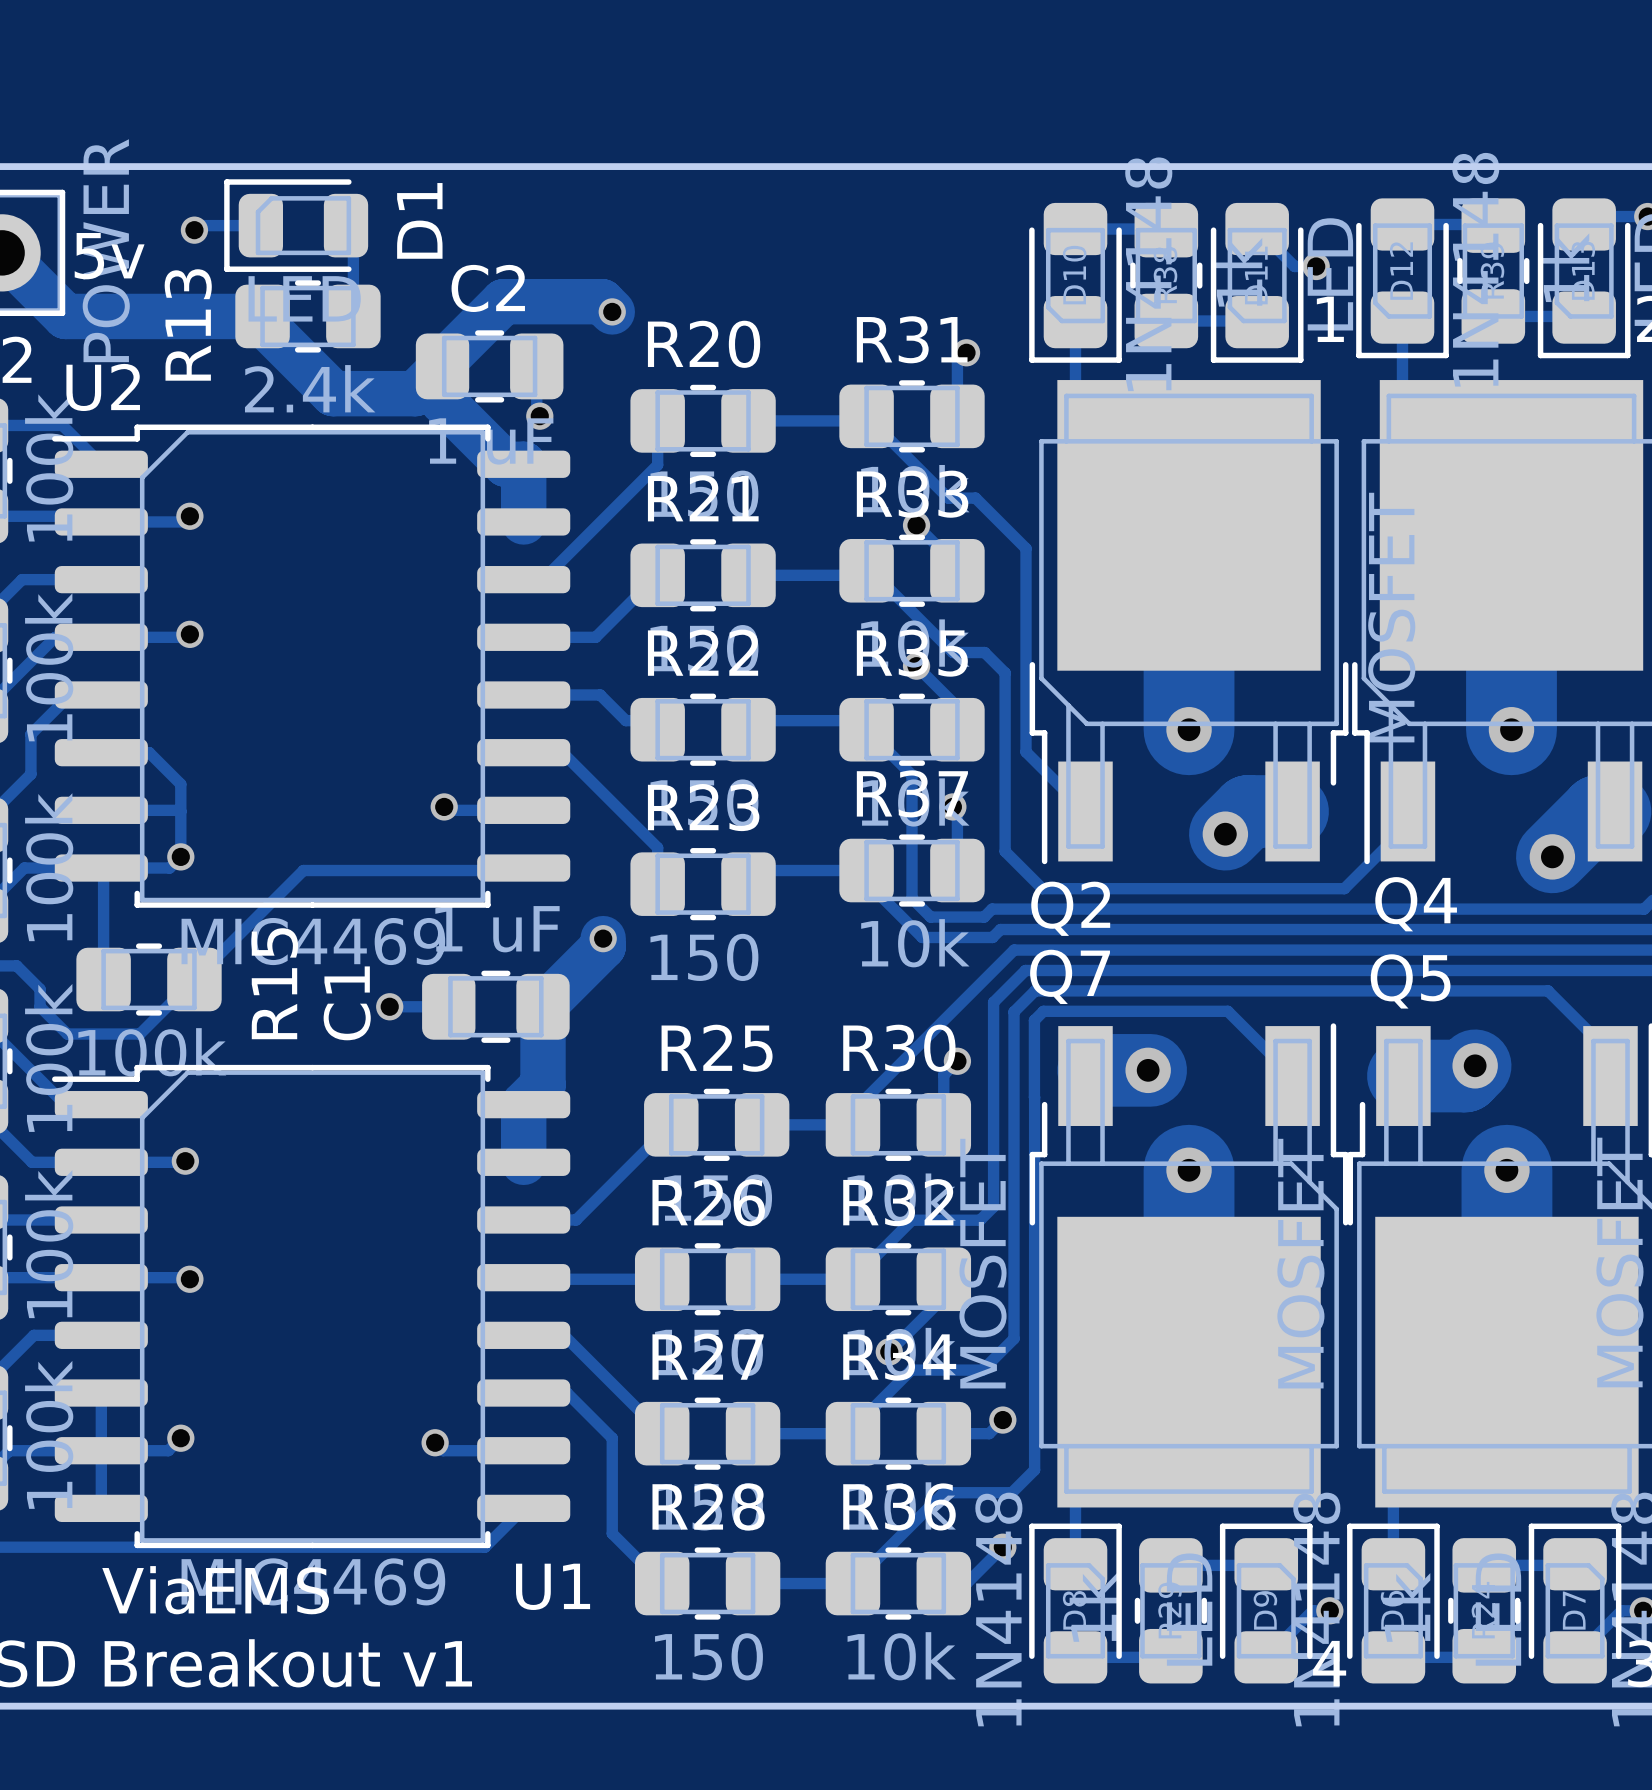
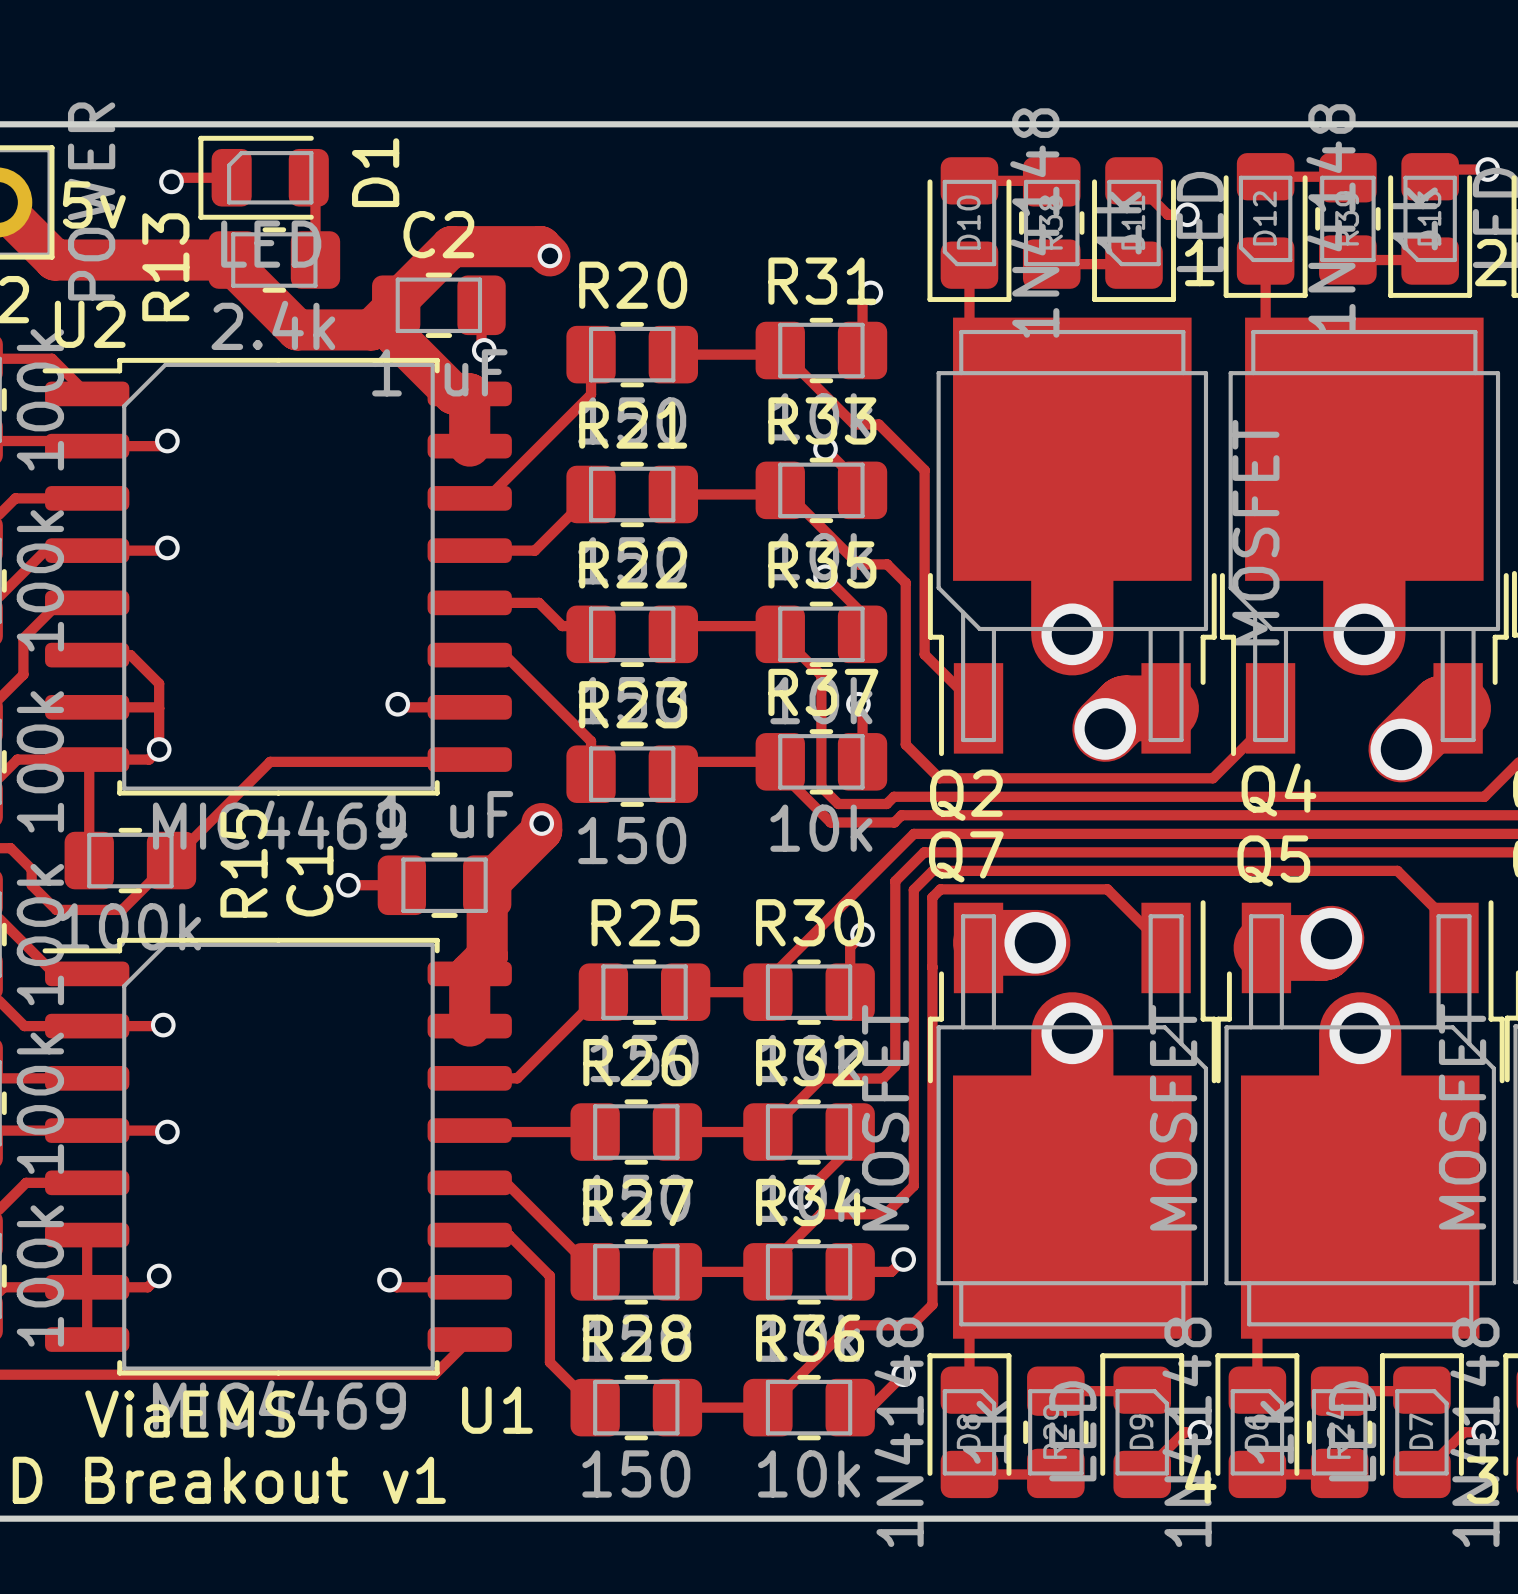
via size: [1166, 707, 1212, 753] -> [1041, 603, 1104, 666]
via size: [1488, 707, 1535, 753] -> [1333, 603, 1396, 666]
via size: [1202, 811, 1249, 857] -> [1074, 698, 1137, 760]
via size: [1529, 834, 1576, 880] -> [1370, 718, 1433, 781]
via size: [1452, 1043, 1498, 1089] -> [1300, 907, 1363, 970]
via size: [1125, 1047, 1171, 1094] -> [1004, 911, 1067, 974]
via size: [1166, 1147, 1212, 1193] -> [1041, 1002, 1104, 1065]
via size: [1484, 1147, 1530, 1193] -> [1329, 1002, 1392, 1065]

